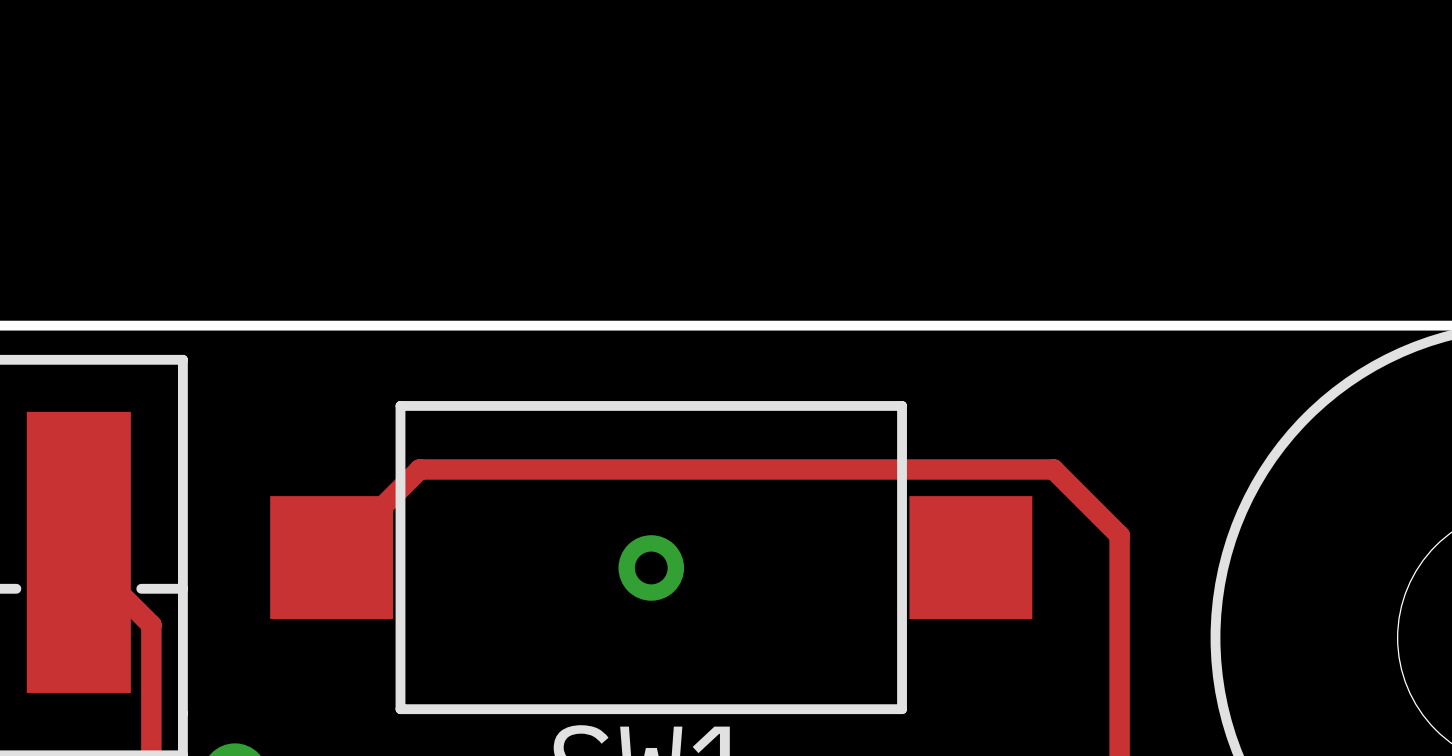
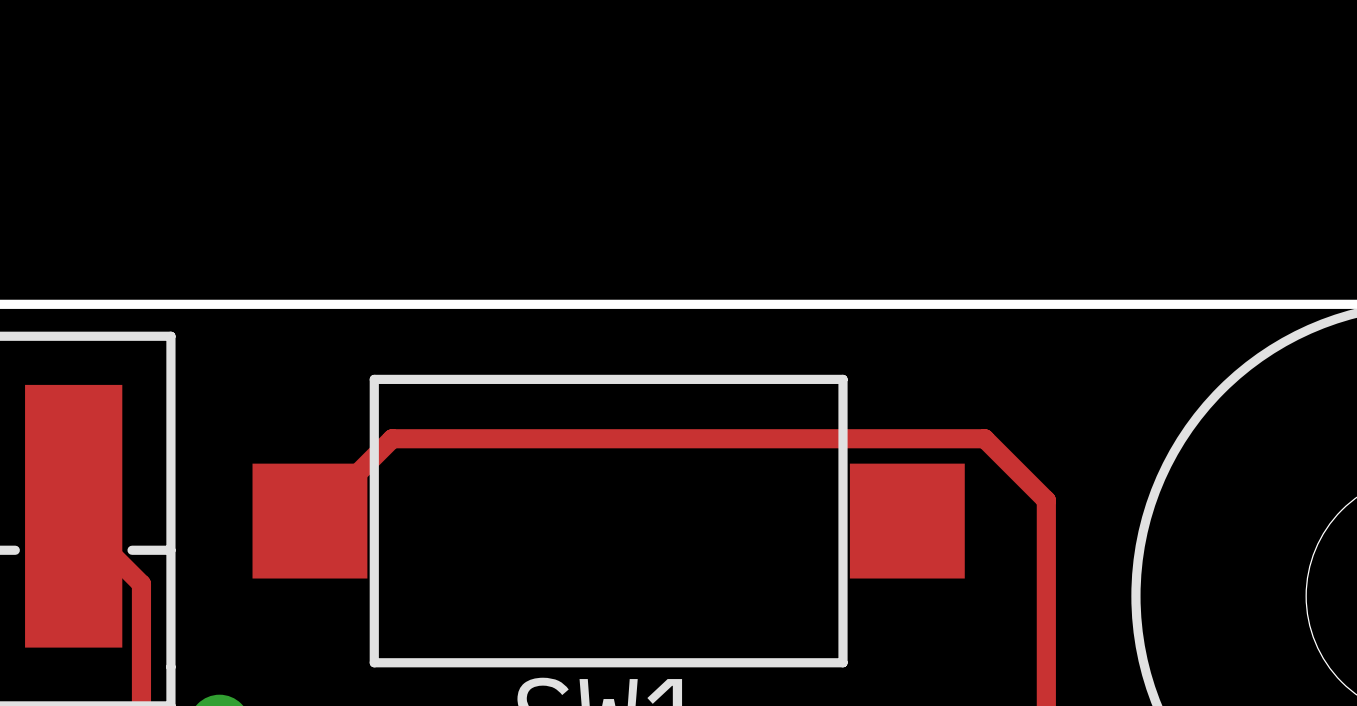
via: (651, 567) -> none

